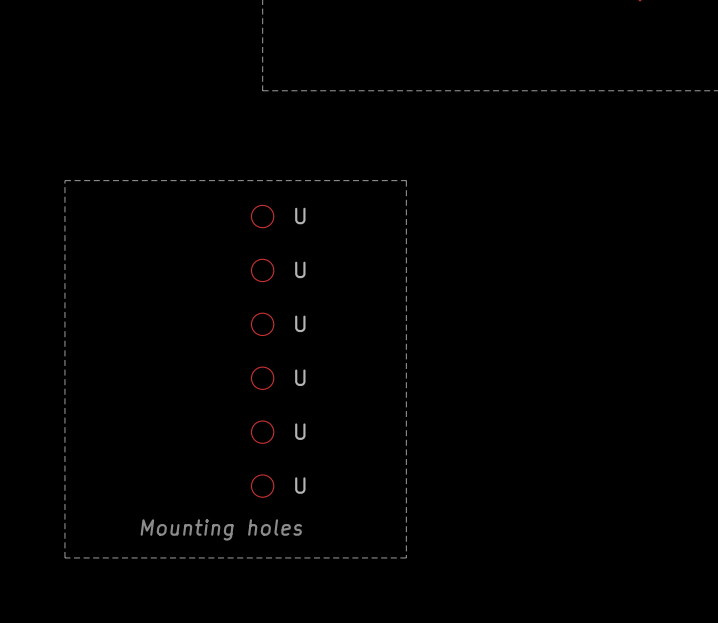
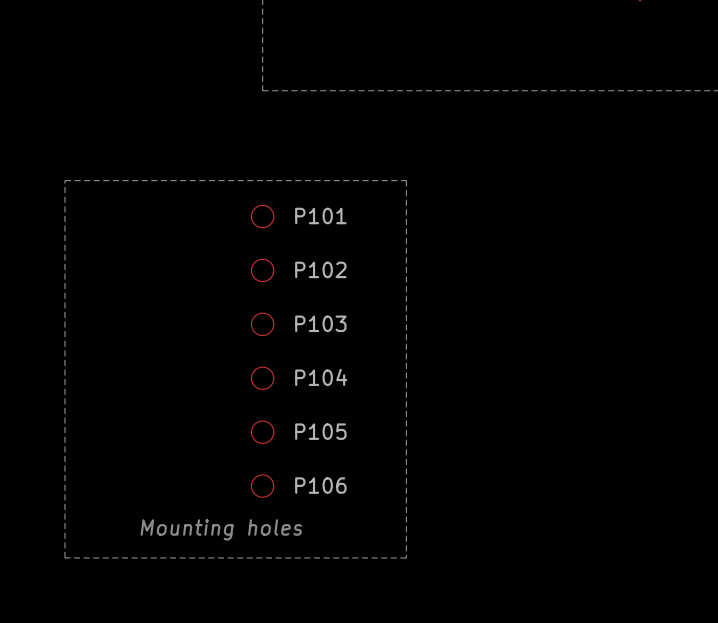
U name: U (300, 215) -> P101 (320, 215)
U name: U (300, 269) -> P102 (320, 269)
U name: U (300, 323) -> P103 (320, 323)
U name: U (300, 377) -> P104 (321, 377)
U name: U (300, 431) -> P105 (320, 431)
U name: U (300, 485) -> P106 (320, 485)

